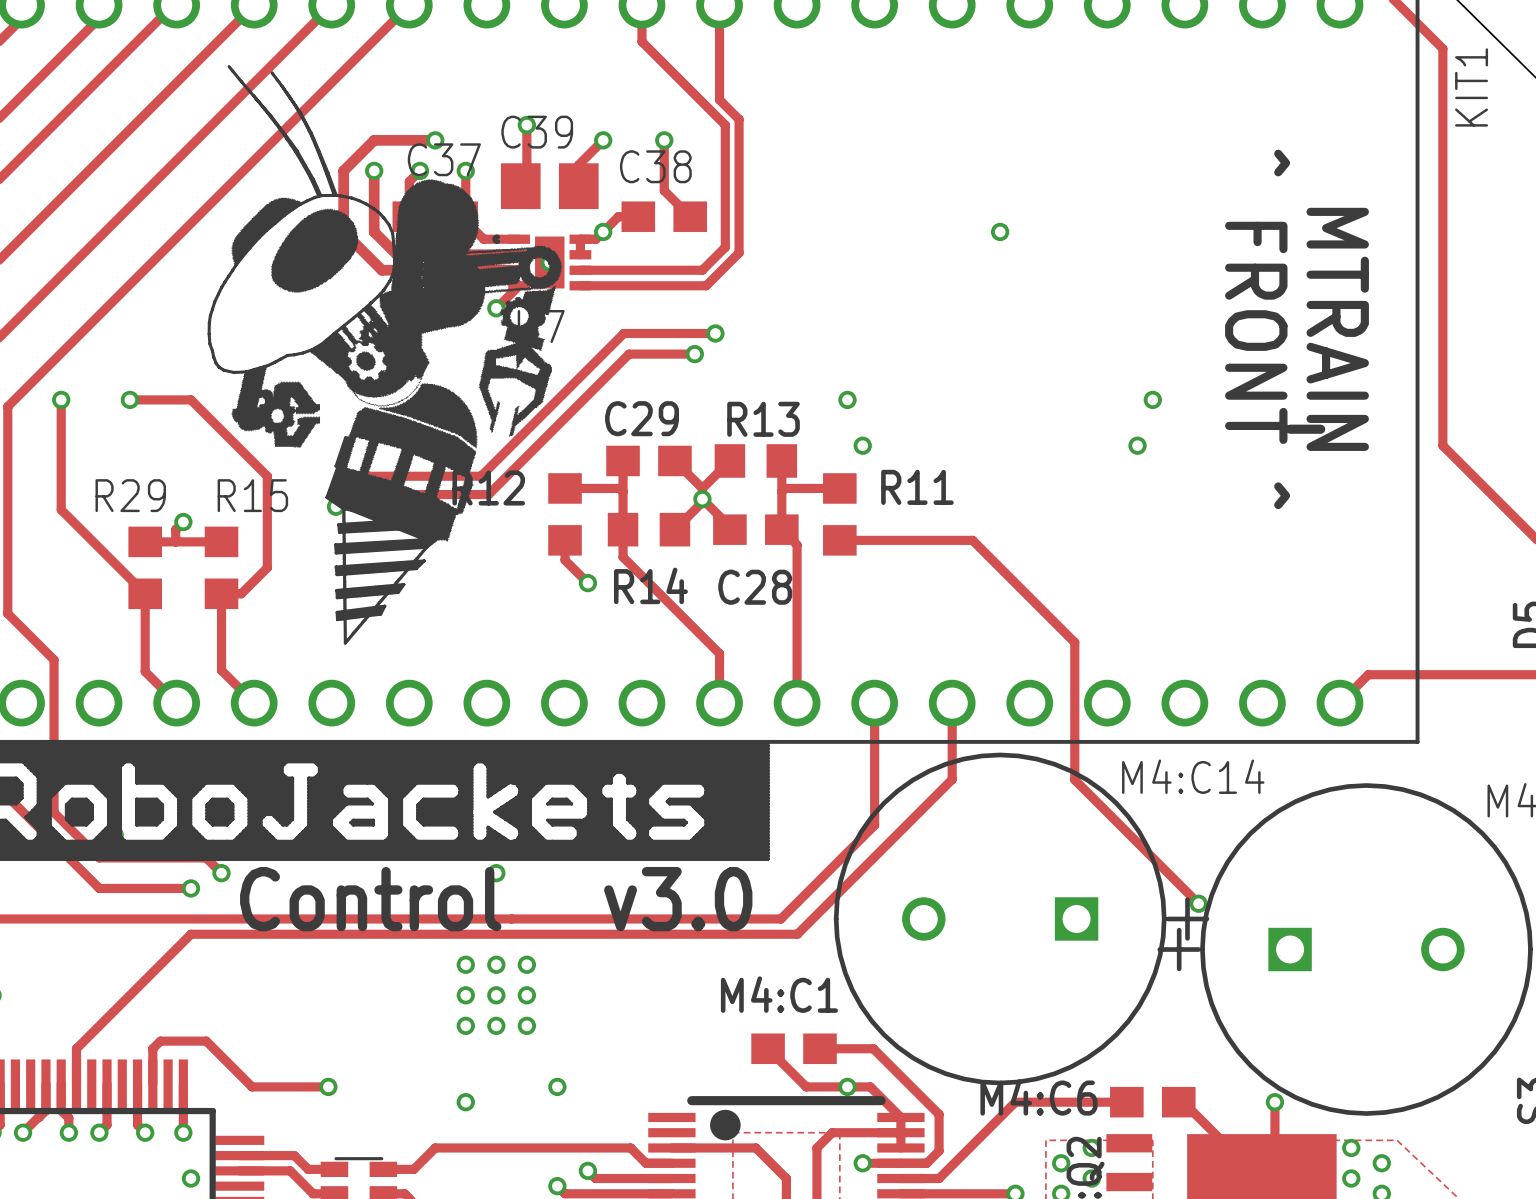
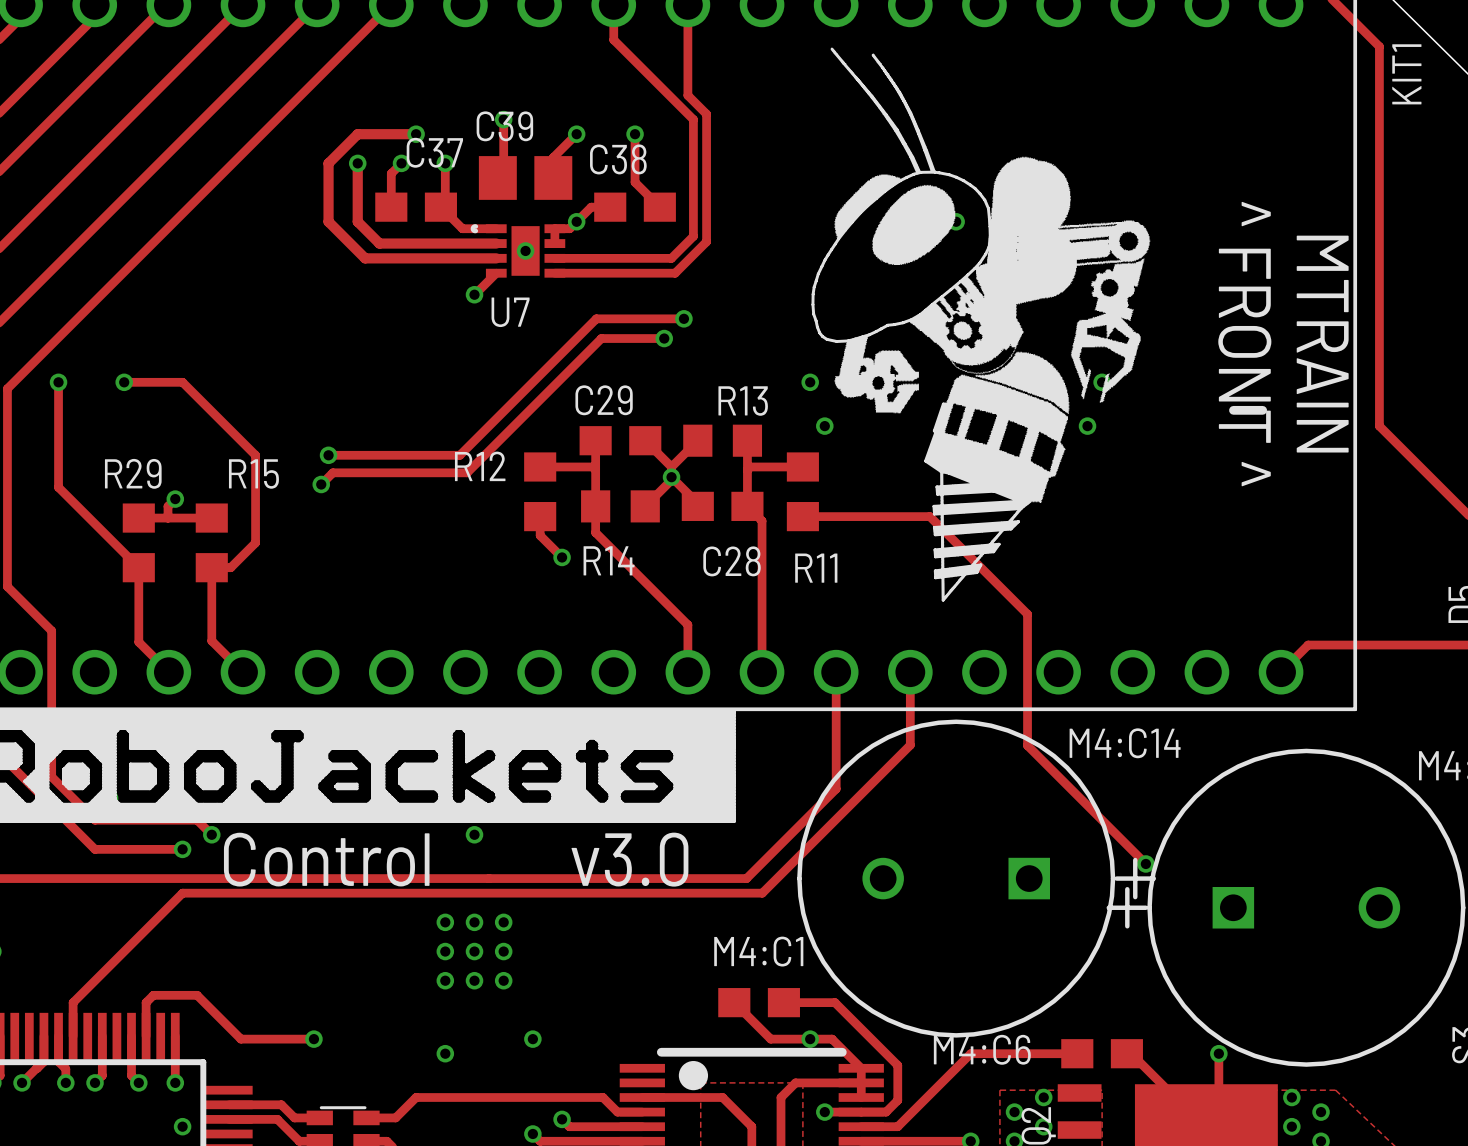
text position: ^ FRONT ^ (1257, 329) -> ^ FRONT ^ (1244, 344)
text position: MTRAIN (1337, 329) -> MTRAIN (1322, 344)
drawing position: (384, 354) -> (980, 324)
R11 name position: R11 (917, 487) -> R11 (816, 568)

